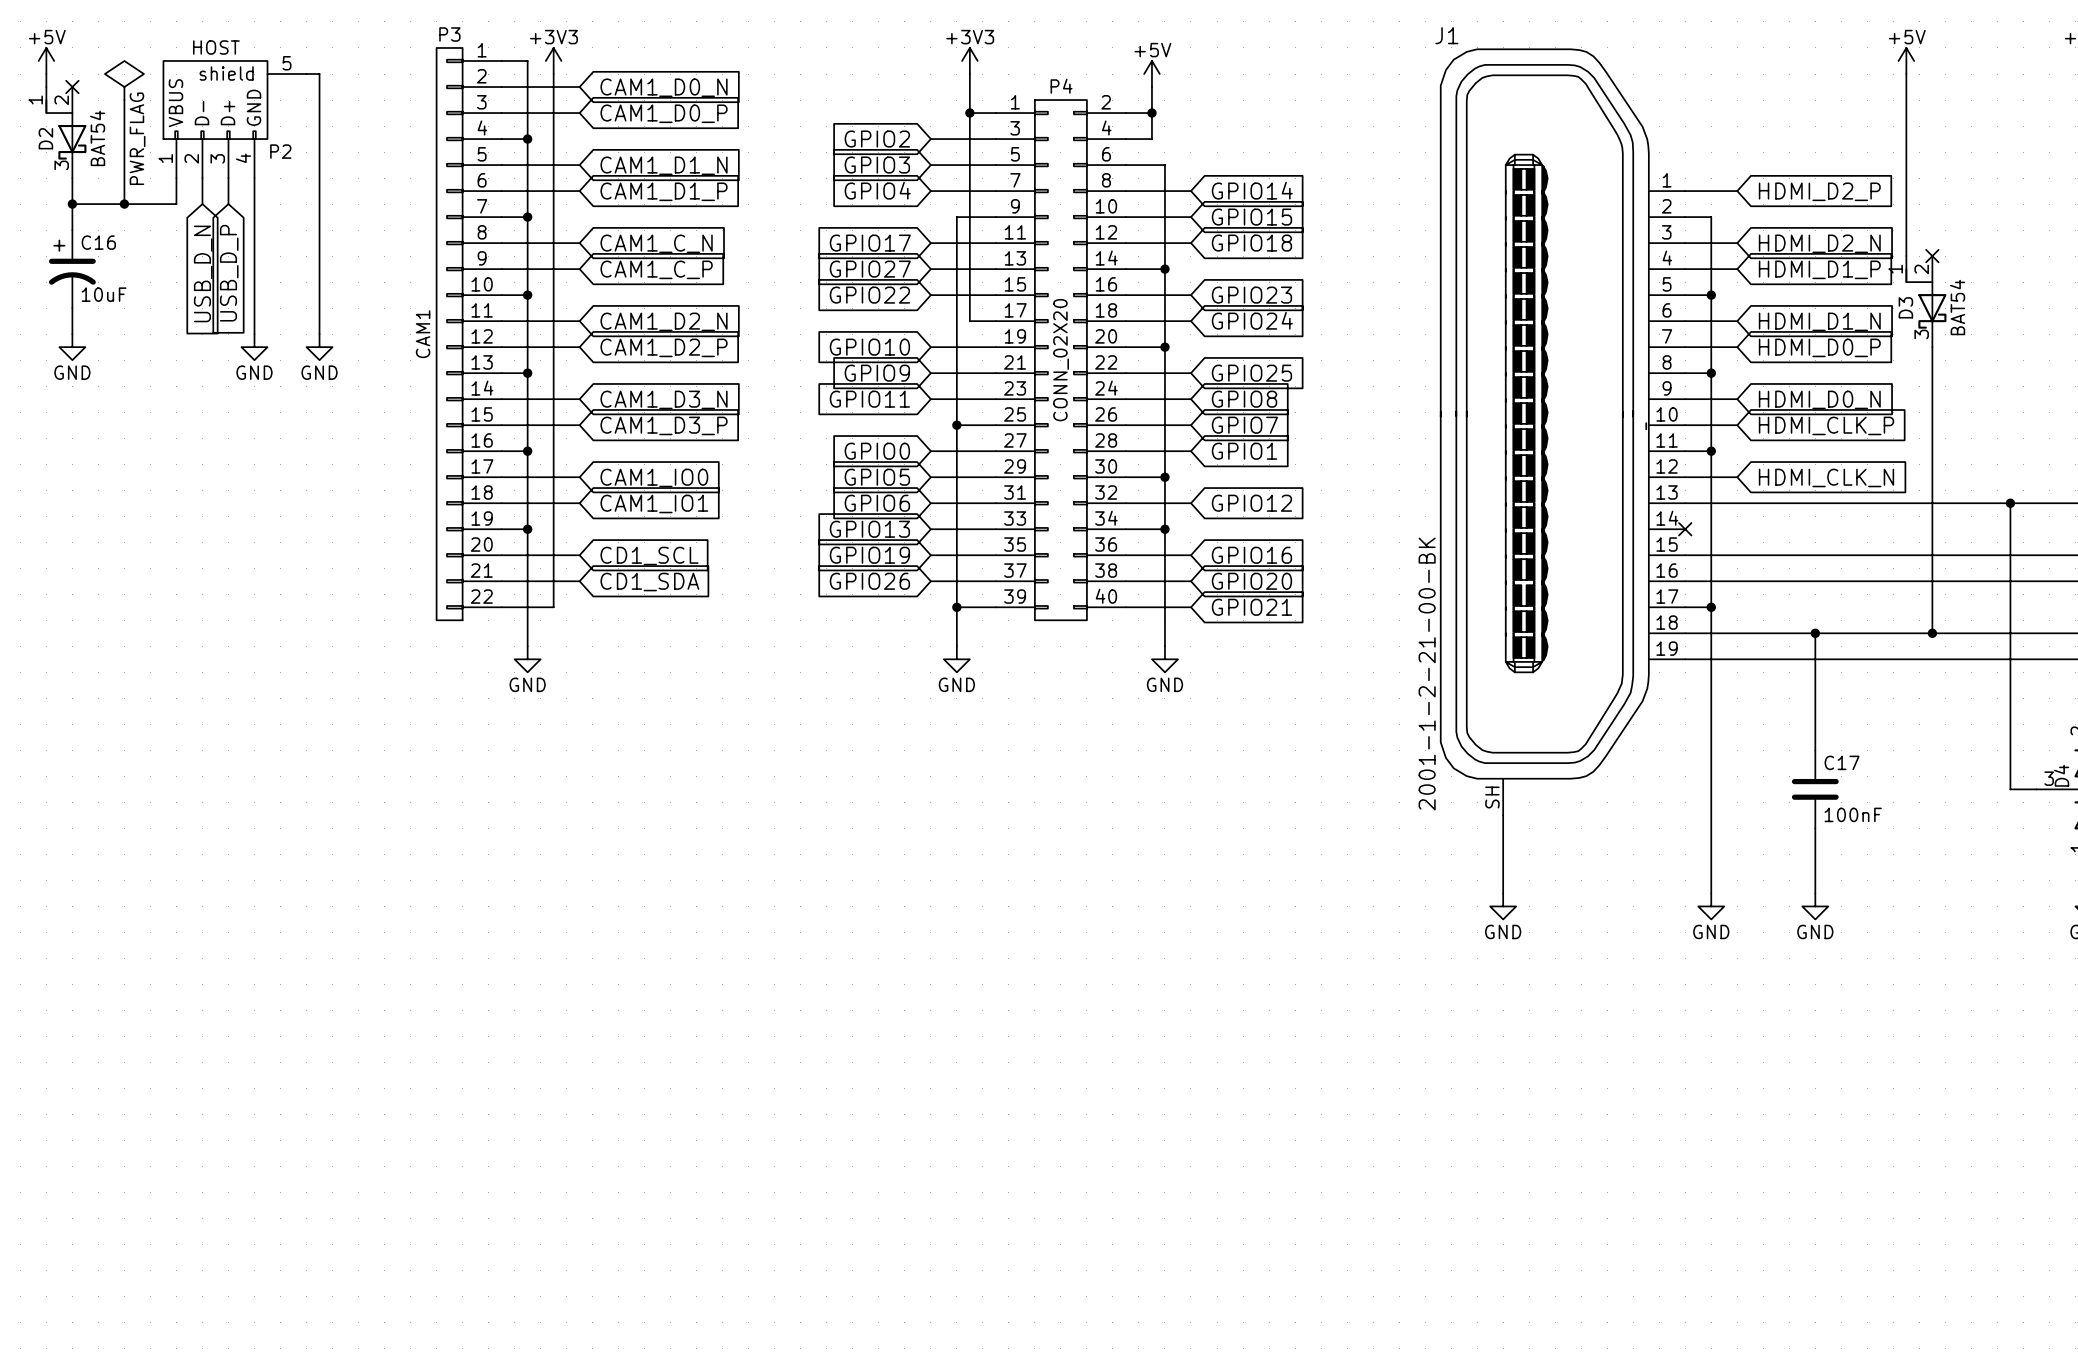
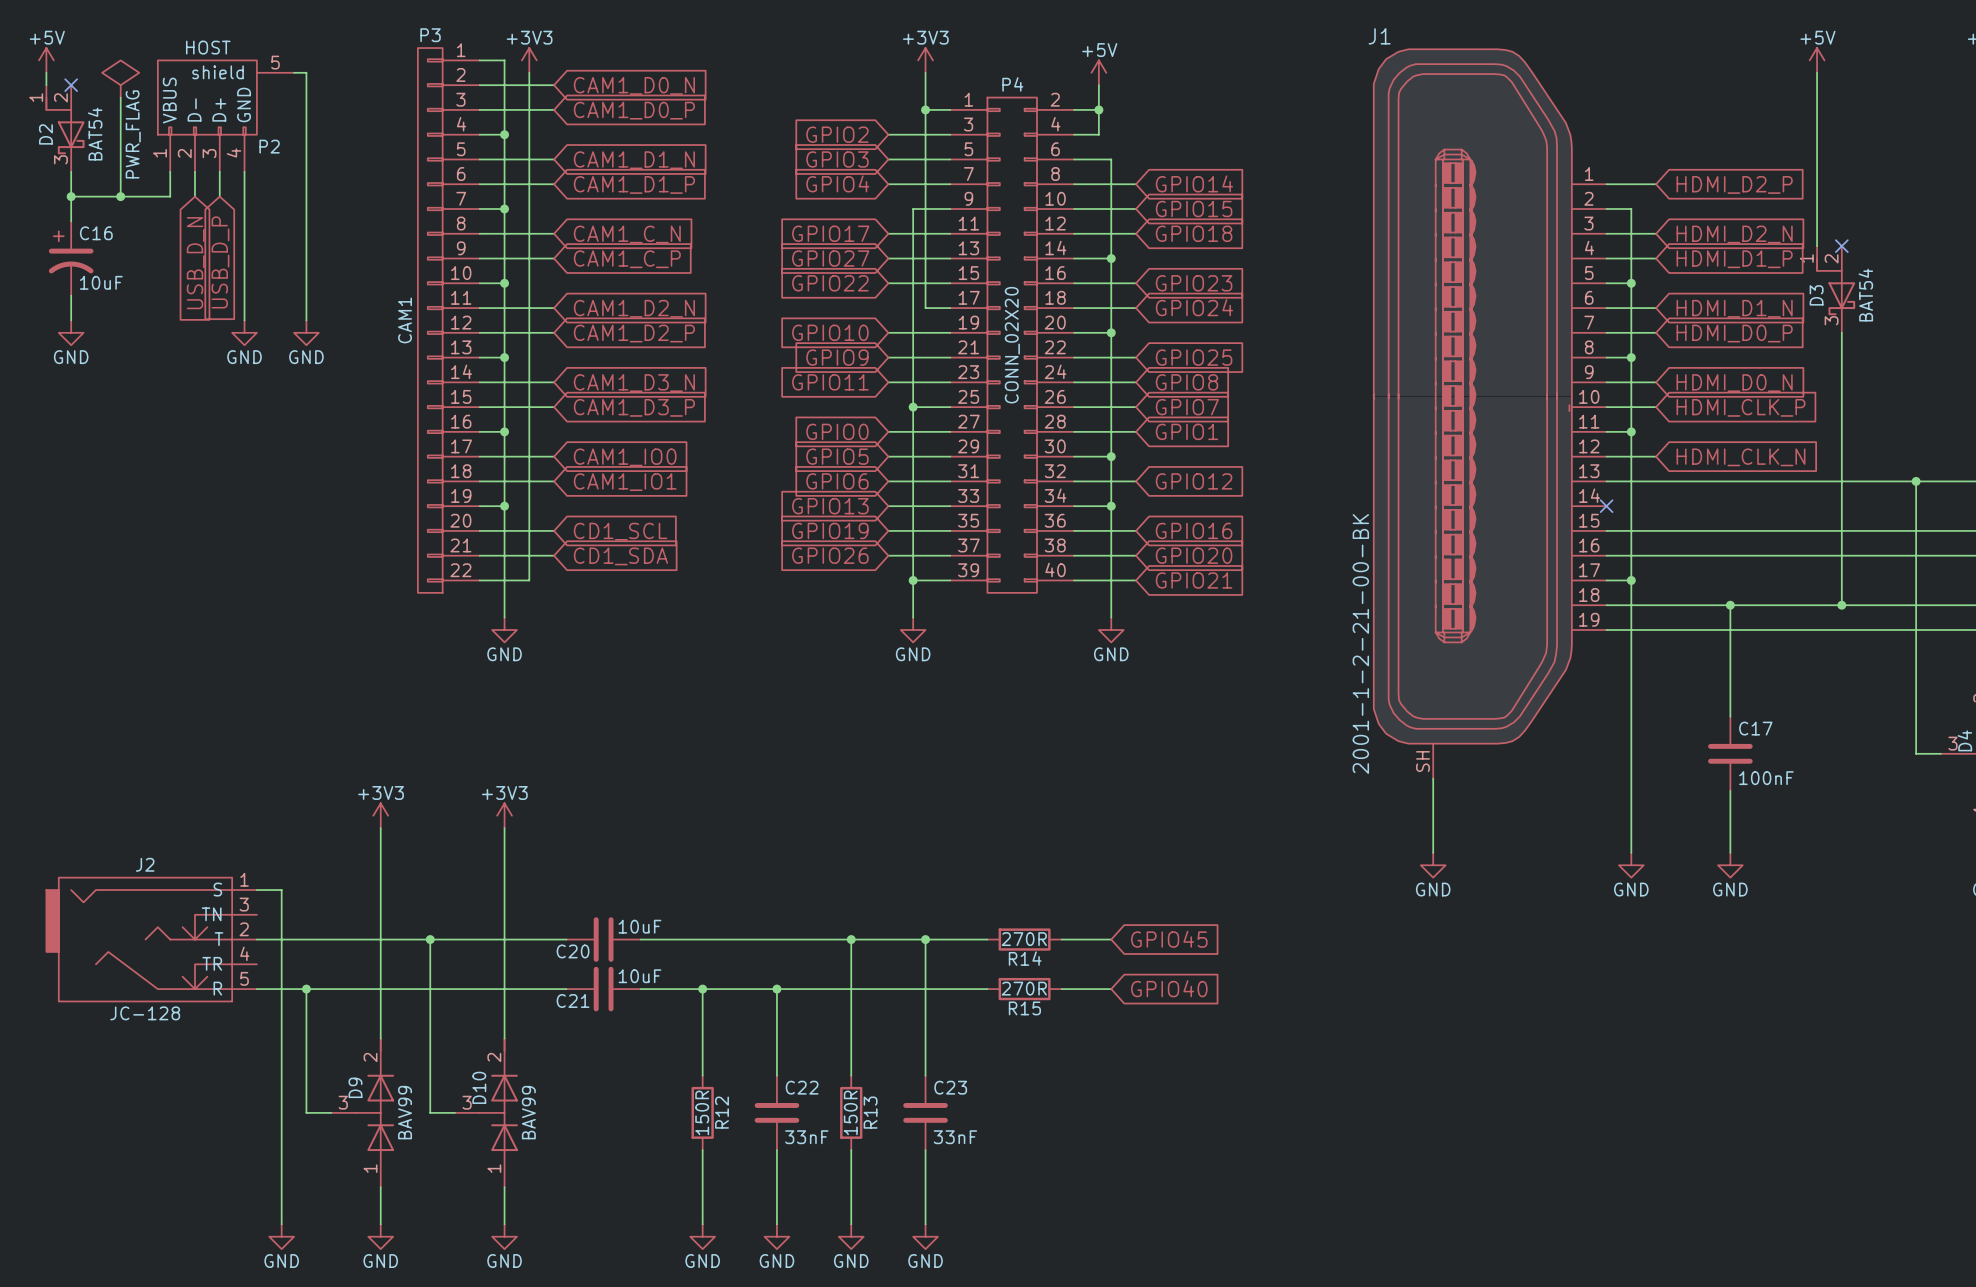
power symbol: none -> +3V3 (380, 815)
power symbol: none -> +3V3 (504, 815)
wire: none -> (380, 828) (380, 1038)
wire: none -> (504, 828) (504, 1038)
wire: none -> (256, 890) (281, 890) (281, 1224)
J2: none -> JC-128 (151, 939)
wire: none -> (256, 939) (566, 939)
wire: none -> (430, 939) (430, 1112) (455, 1112)
junction: none -> (430, 939)
C20: none -> 10uF (603, 939)
wire: none -> (640, 939) (987, 939)
wire: none -> (851, 939) (851, 1075)
junction: none -> (851, 939)
wire: none -> (925, 939) (925, 1075)
junction: none -> (925, 939)
R14: none -> 270R (1024, 939)
wire: none -> (1061, 939) (1111, 939)
global label: none -> GPIO45 (1169, 939)
wire: none -> (256, 989) (566, 989)
wire: none -> (306, 989) (306, 1112) (331, 1112)
junction: none -> (306, 989)
C21: none -> 10uF (603, 989)
wire: none -> (640, 989) (987, 989)
wire: none -> (702, 989) (702, 1075)
junction: none -> (702, 989)
wire: none -> (776, 989) (776, 1075)
junction: none -> (776, 989)
R15: none -> 270R (1024, 989)
wire: none -> (1061, 989) (1111, 989)
global label: none -> GPIO40 (1169, 988)
D9: none -> BAV99 (362, 1112)
D10: none -> BAV99 (486, 1112)
R12: none -> 150R (702, 1112)
C22: none -> 33nF (776, 1112)
R13: none -> 150R (851, 1112)
C23: none -> 33nF (925, 1112)
wire: none -> (702, 1150) (702, 1224)
wire: none -> (776, 1150) (776, 1224)
wire: none -> (851, 1150) (851, 1224)
wire: none -> (925, 1150) (925, 1224)
wire: none -> (380, 1187) (380, 1224)
wire: none -> (504, 1187) (504, 1224)
power symbol: none -> GND (281, 1236)
power symbol: none -> GND (380, 1236)
power symbol: none -> GND (504, 1236)
power symbol: none -> GND (702, 1236)
power symbol: none -> GND (776, 1236)
power symbol: none -> GND (851, 1236)
power symbol: none -> GND (925, 1236)

